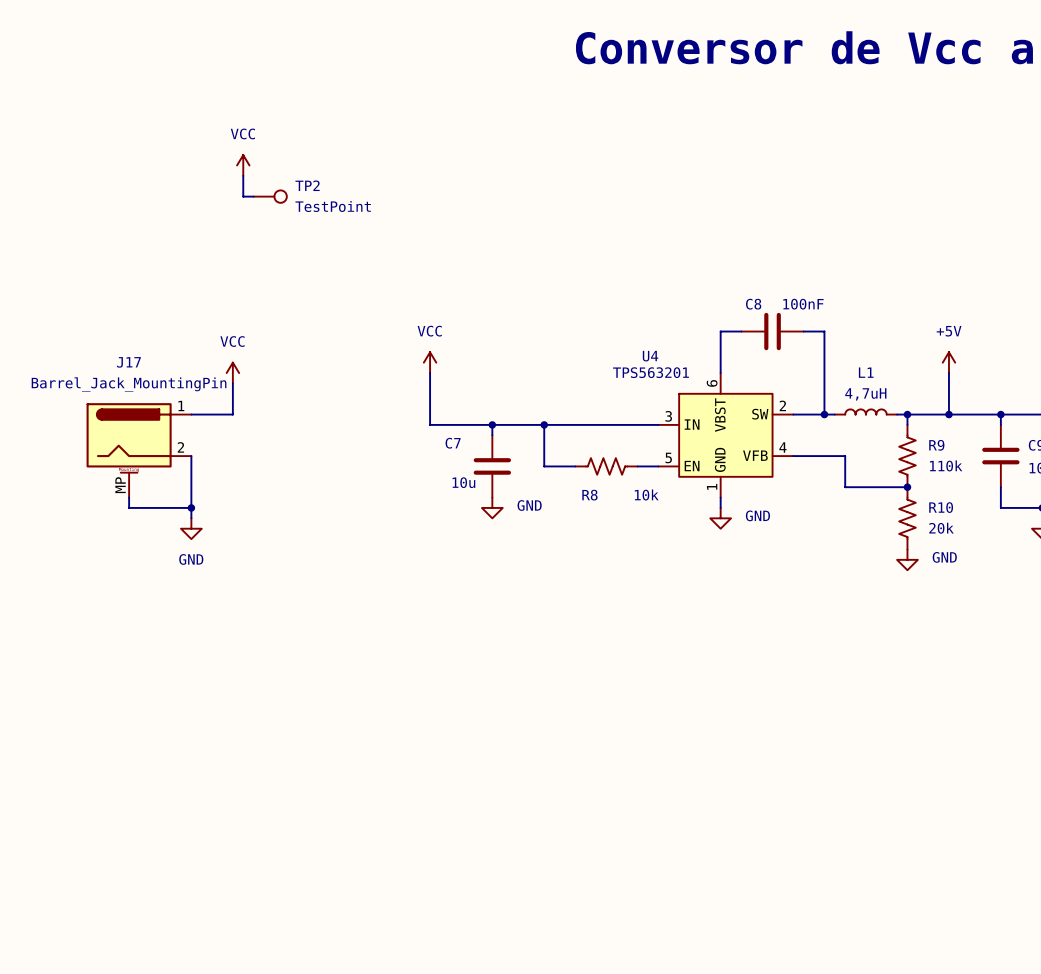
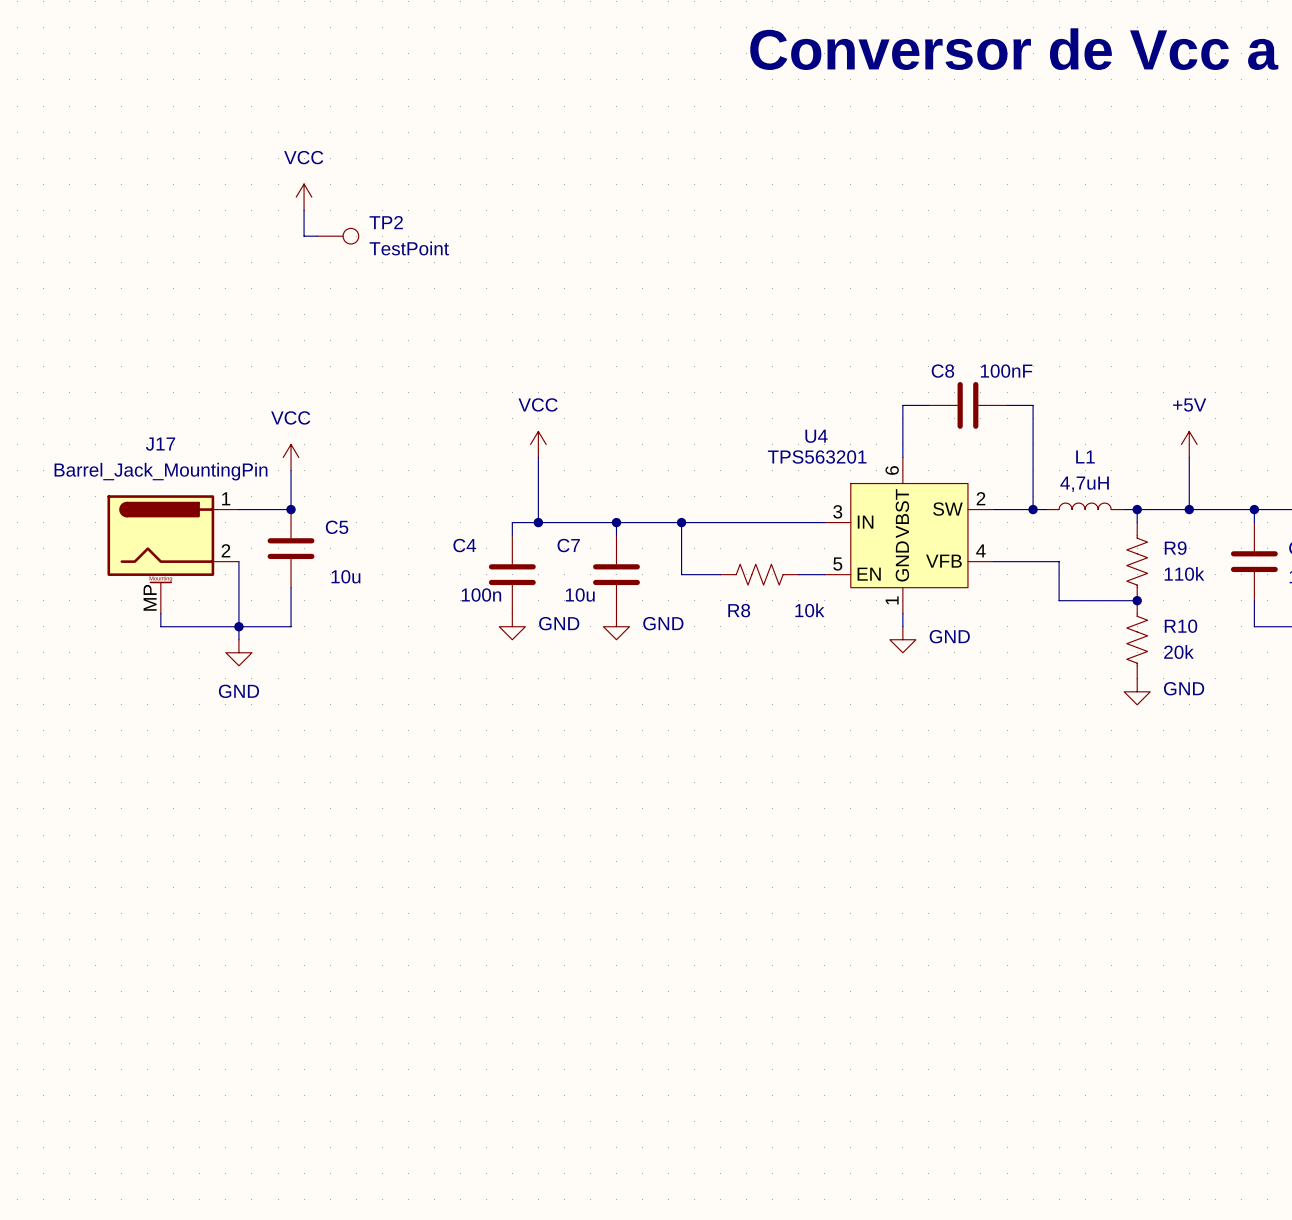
junction: none -> (291, 509)
wire: none -> (538, 522) (512, 522) (512, 535)
junction: none -> (538, 522)
C5: none -> 10u (291, 548)
C4: none -> 100n (512, 574)
wire: none -> (291, 587) (291, 626) (238, 626)
power symbol: none -> GND (512, 626)

